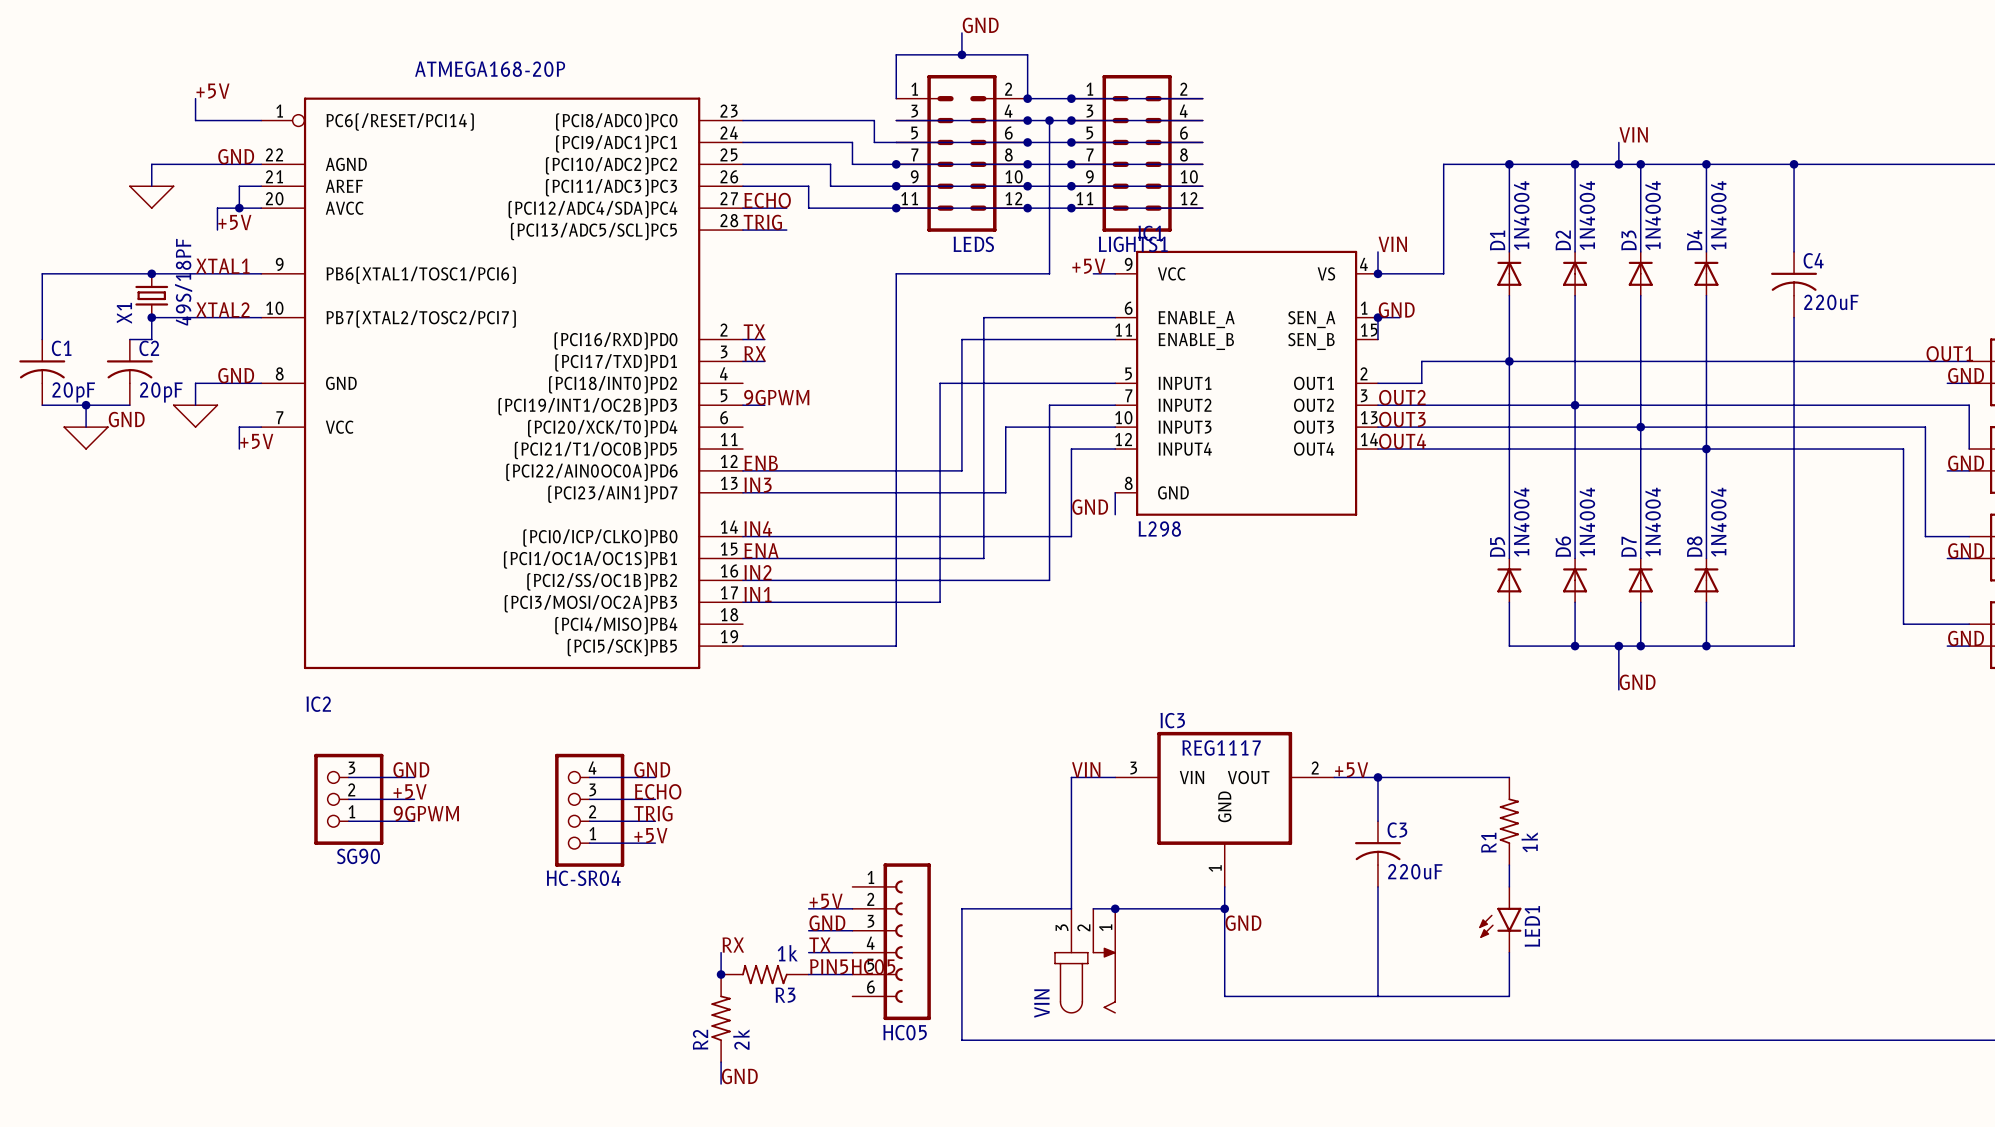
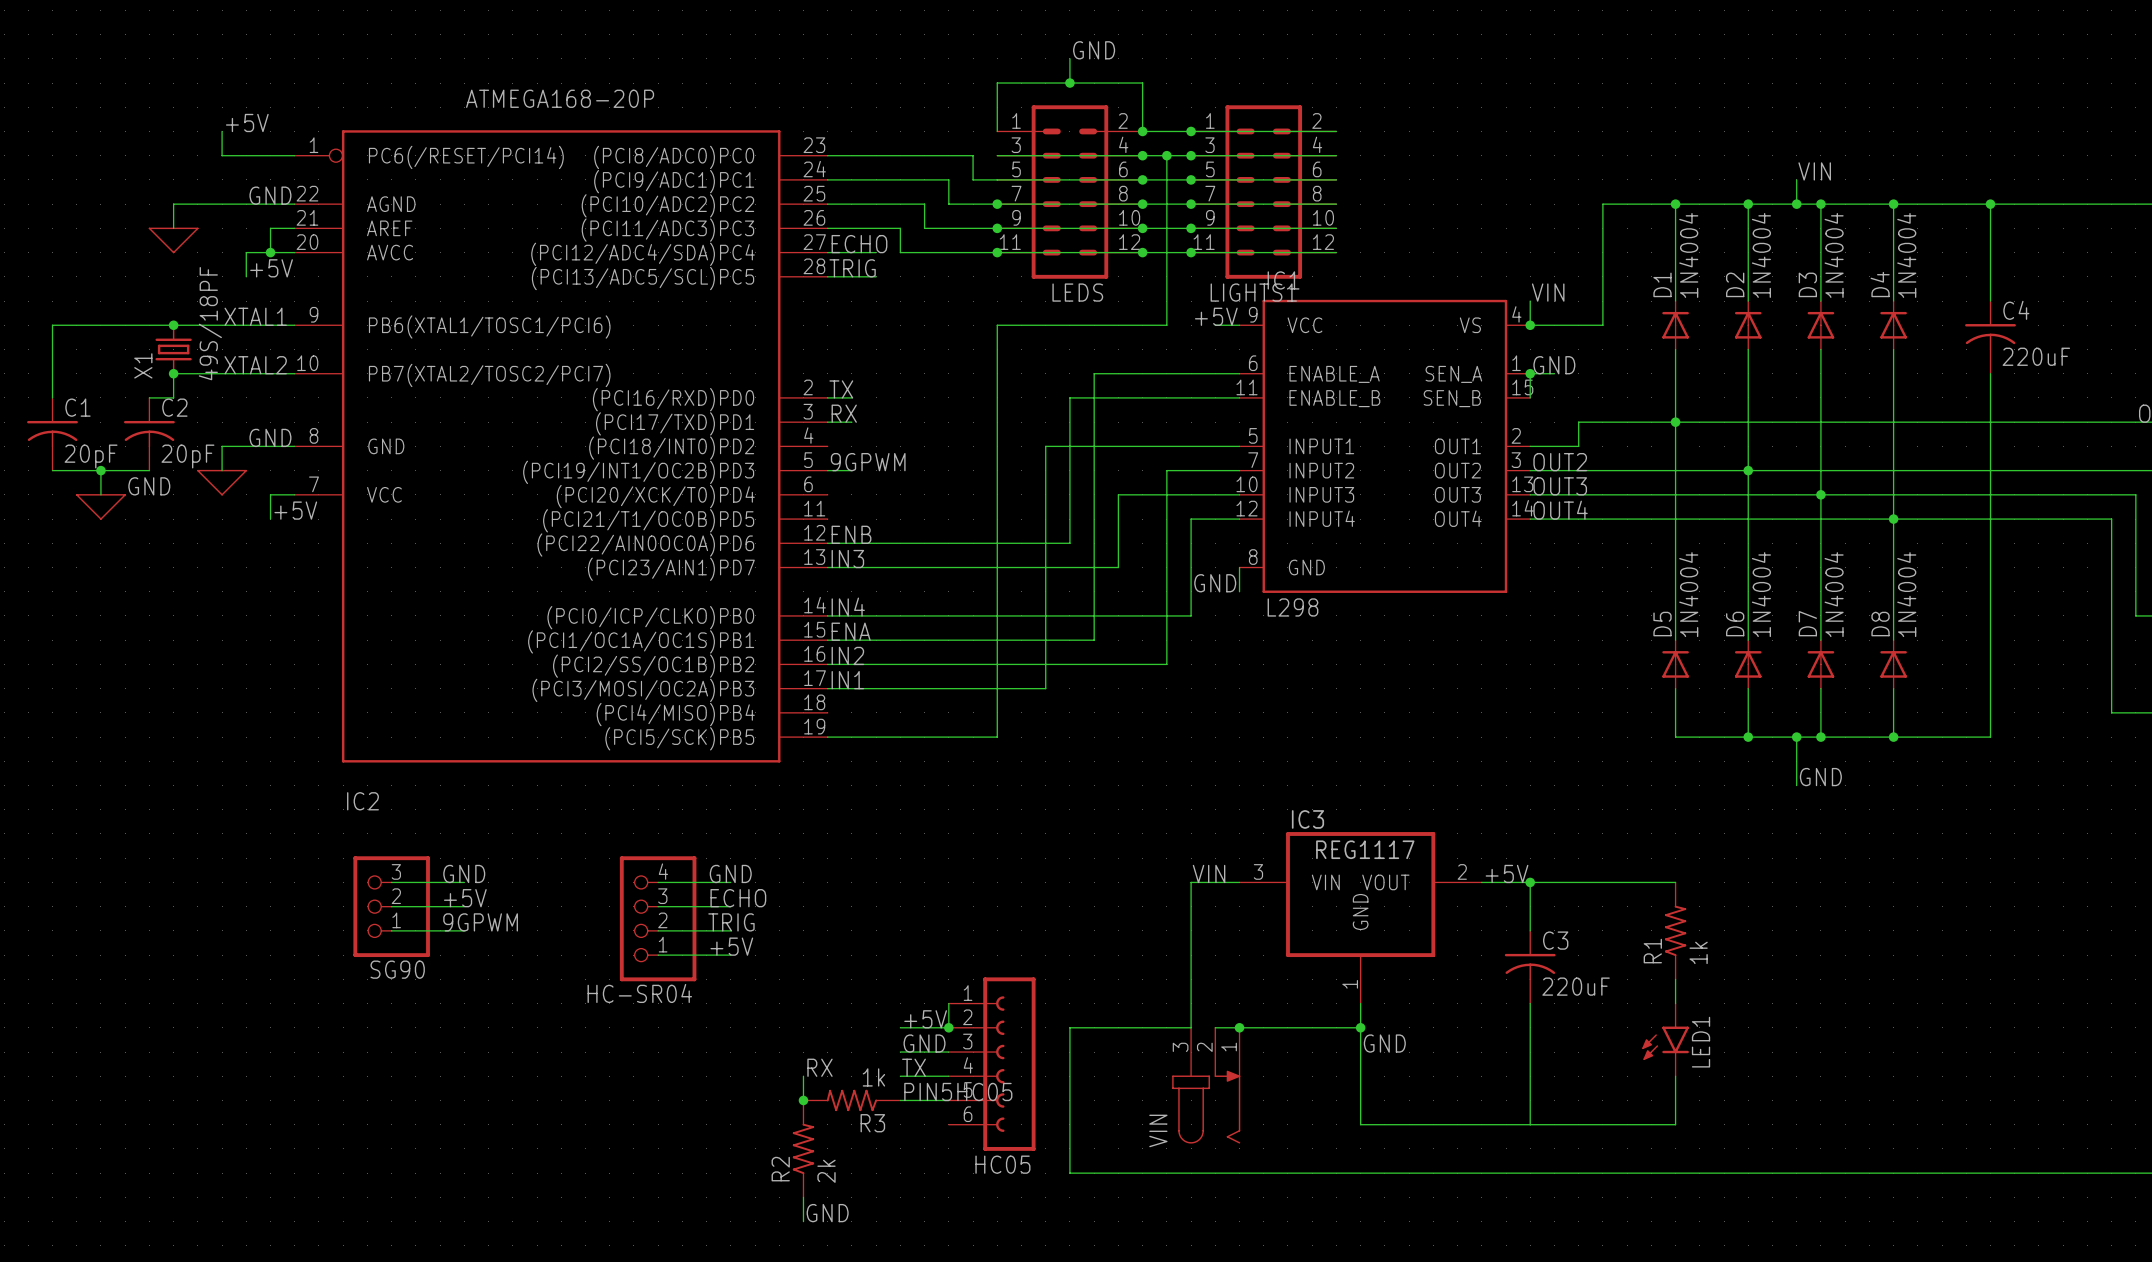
wire: none -> (948, 1003) (948, 1027)
junction: none -> (948, 1027)

